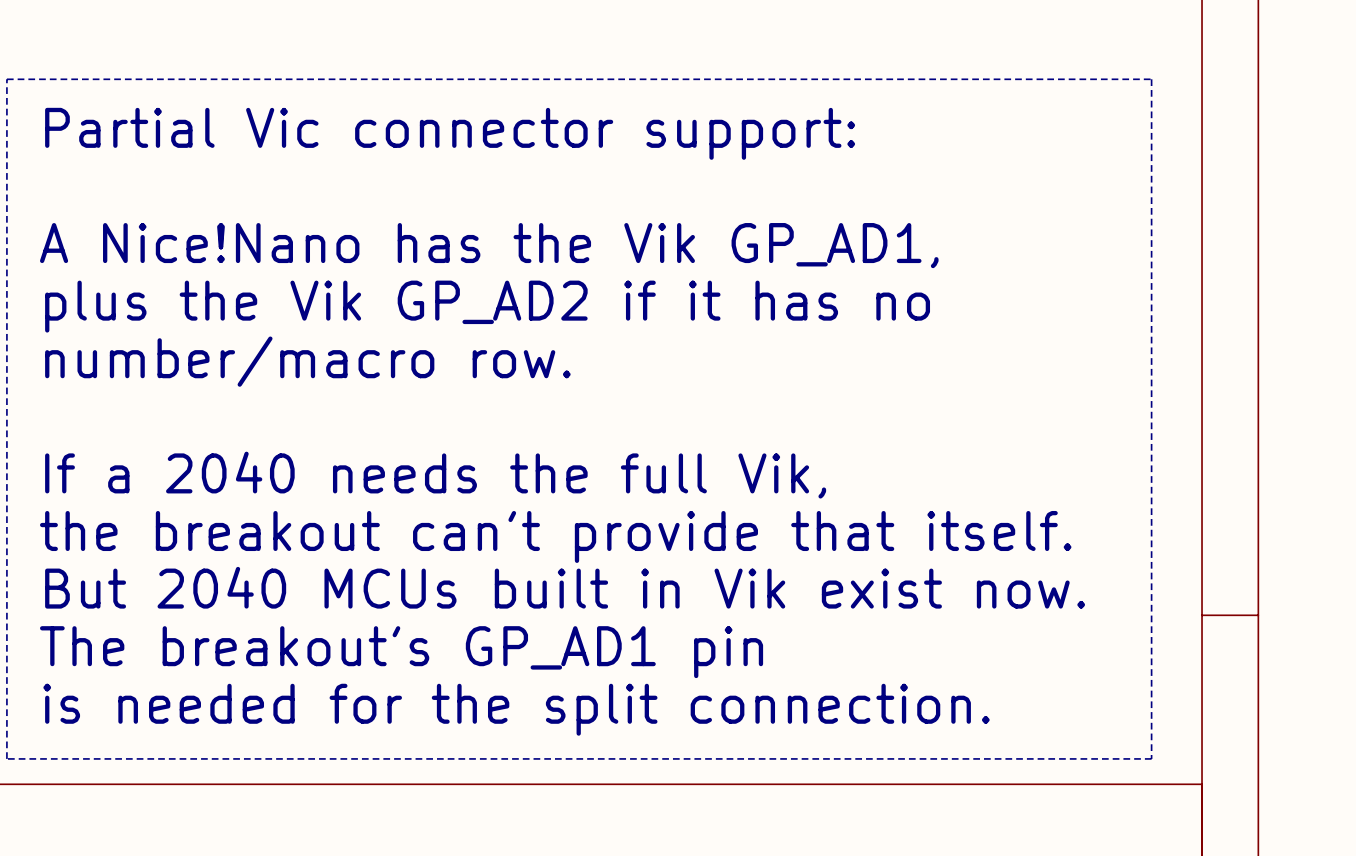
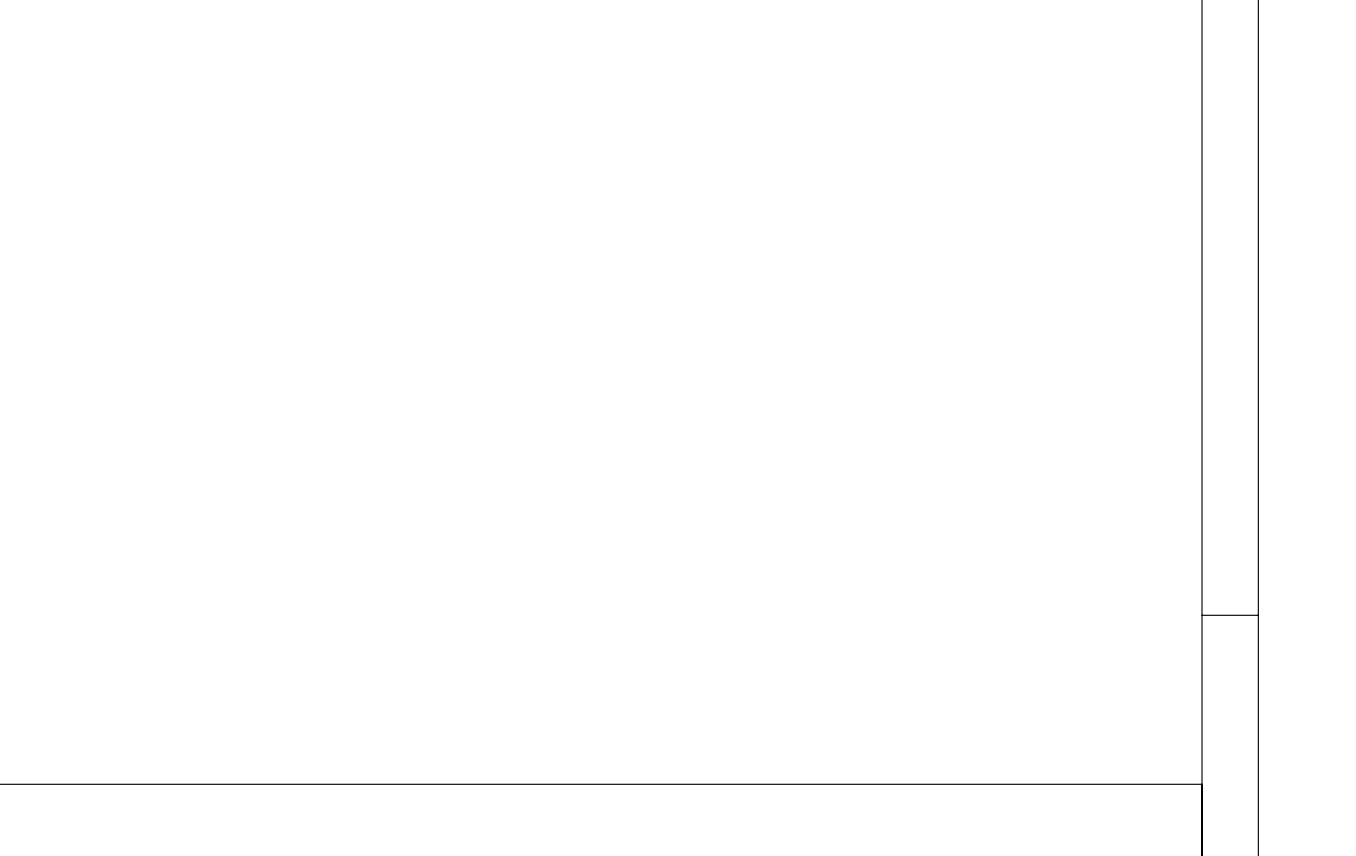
line: (6, 79) (1151, 79) (1151, 758) (6, 758) (6, 79) -> none
text: Partial Vic connector support: (450, 133) -> none
text: A Nice!Nano has the Vik GP_AD1, (489, 245) -> none
text: plus the Vik GP_AD2 if it has no (487, 306) -> none
text: number/macro row. (307, 361) -> none
text: If a 2040 needs the full Vik, (435, 475) -> none
text: the breakout can't provide that itself. (555, 536) -> none
text: But 2040 MCUs built in Vik exist now. (565, 587) -> none
text: The breakout's GP_AD1 pin (401, 652) -> none
text: is needed for the split connection. (516, 709) -> none

